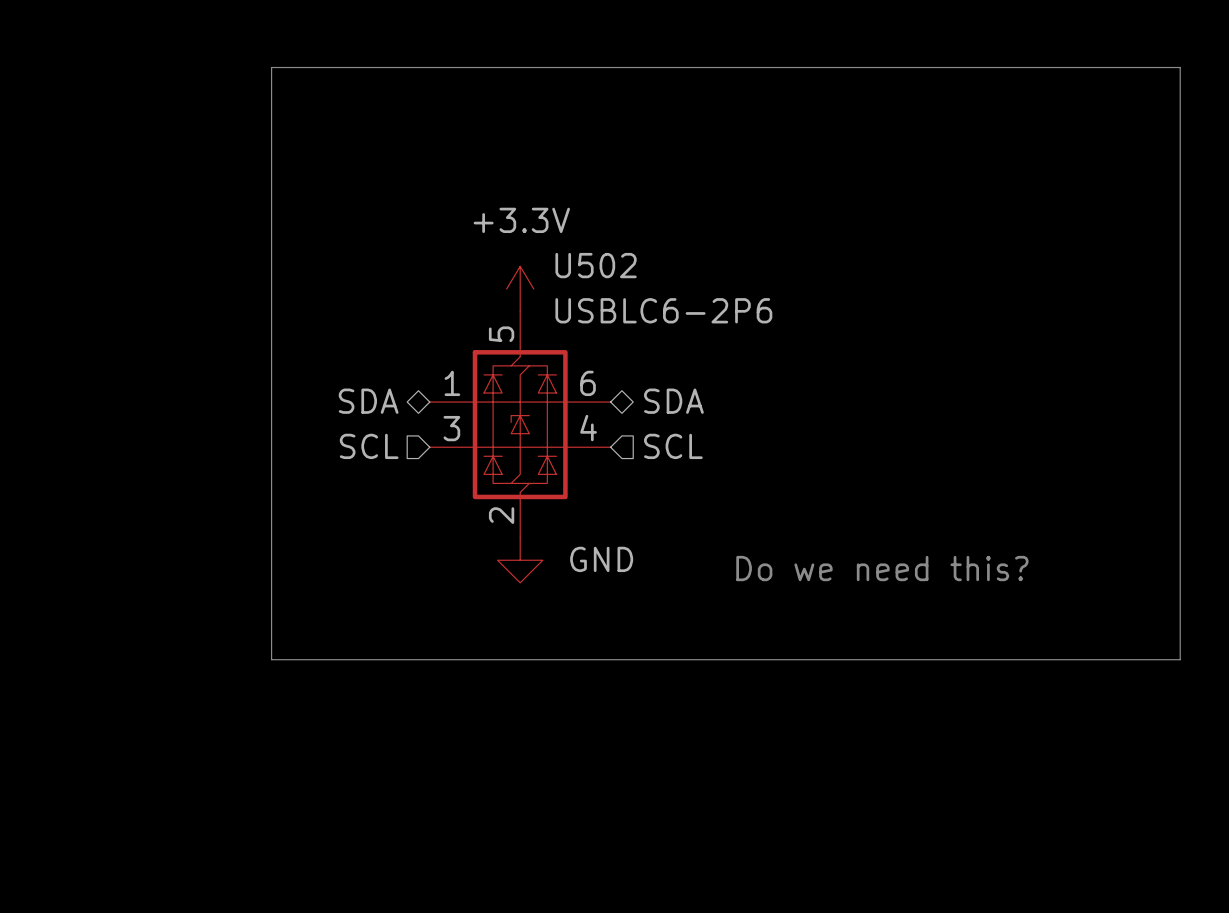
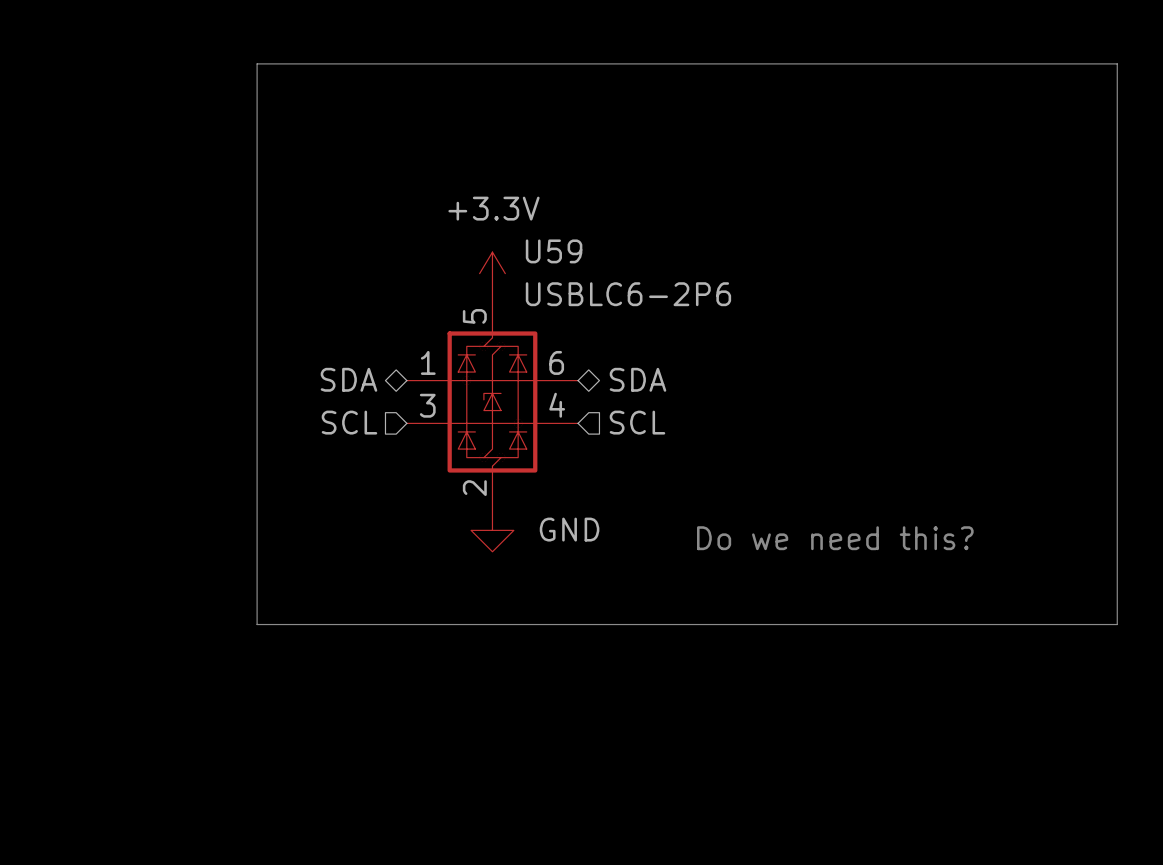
U502 name: U502 (596, 265) -> U59 (554, 251)

